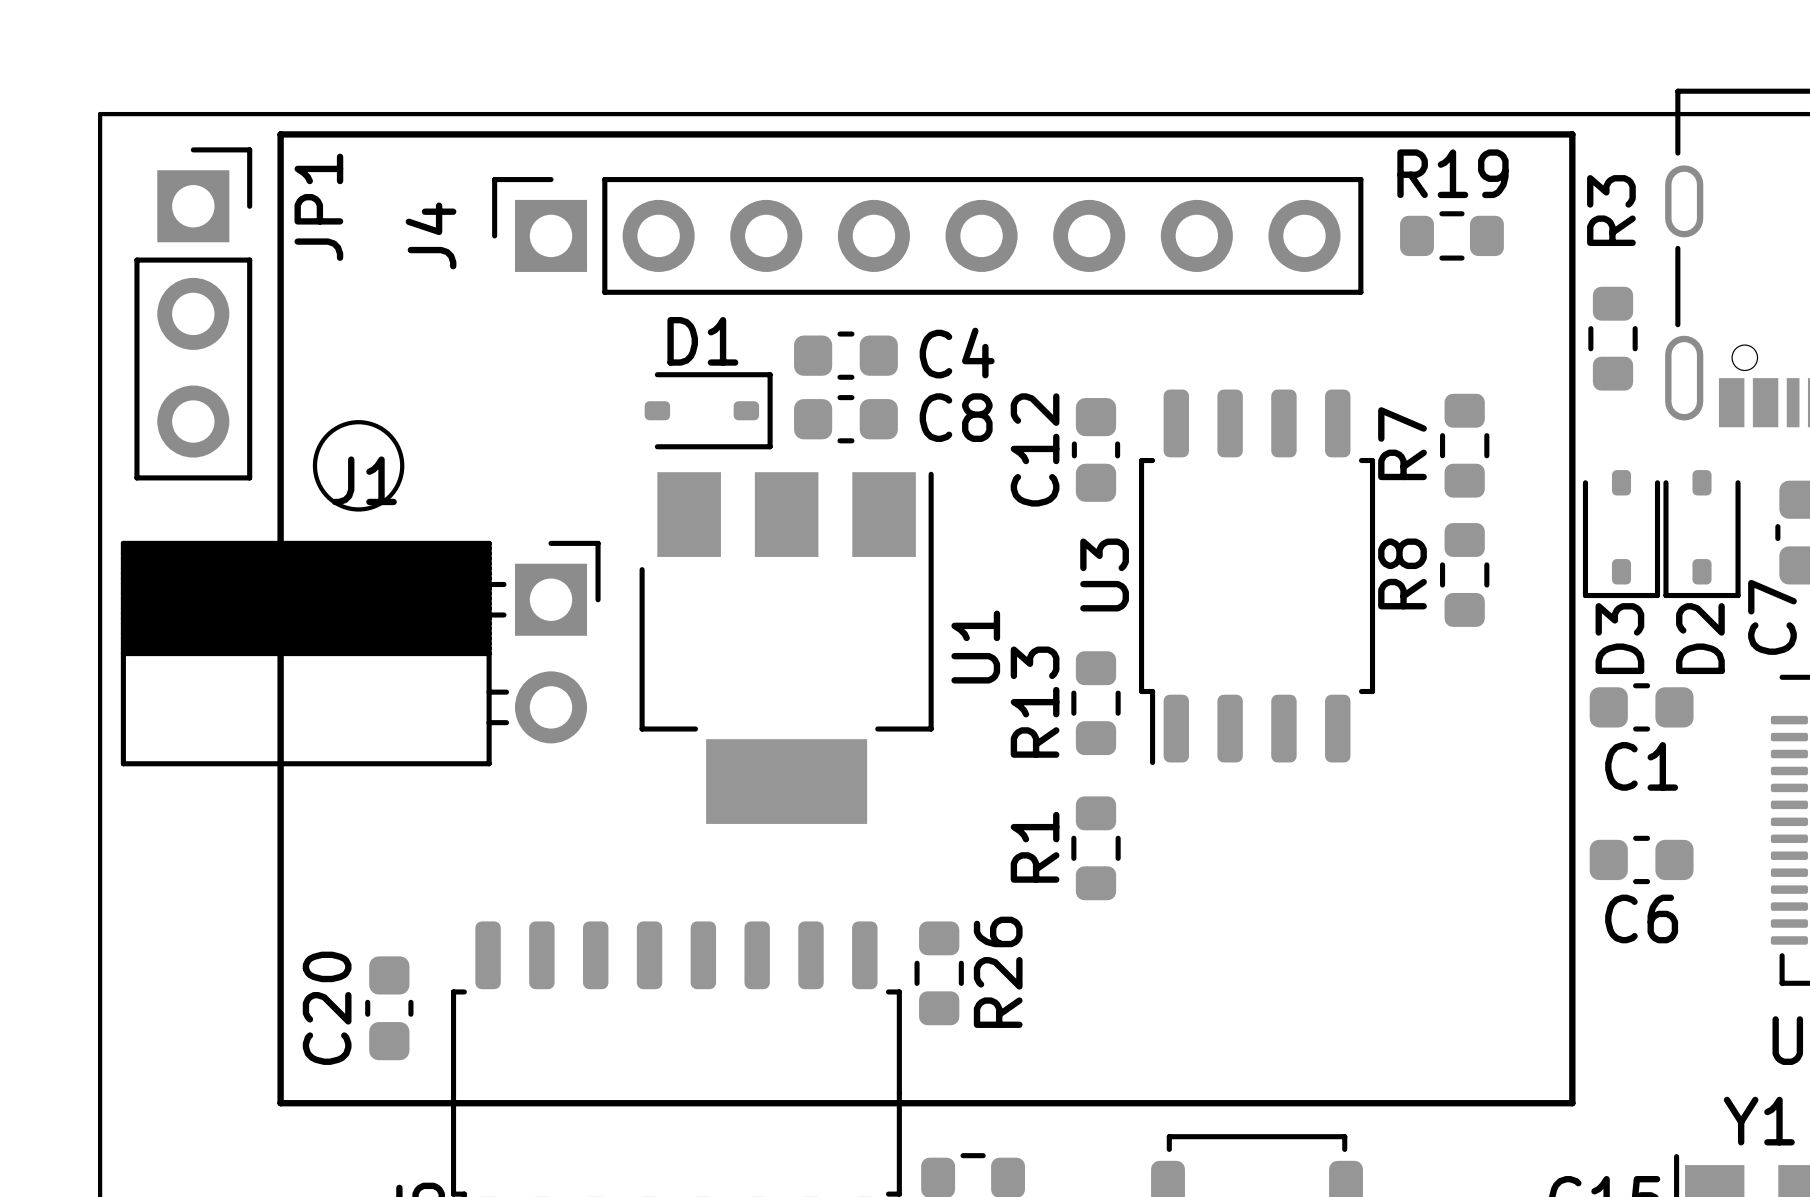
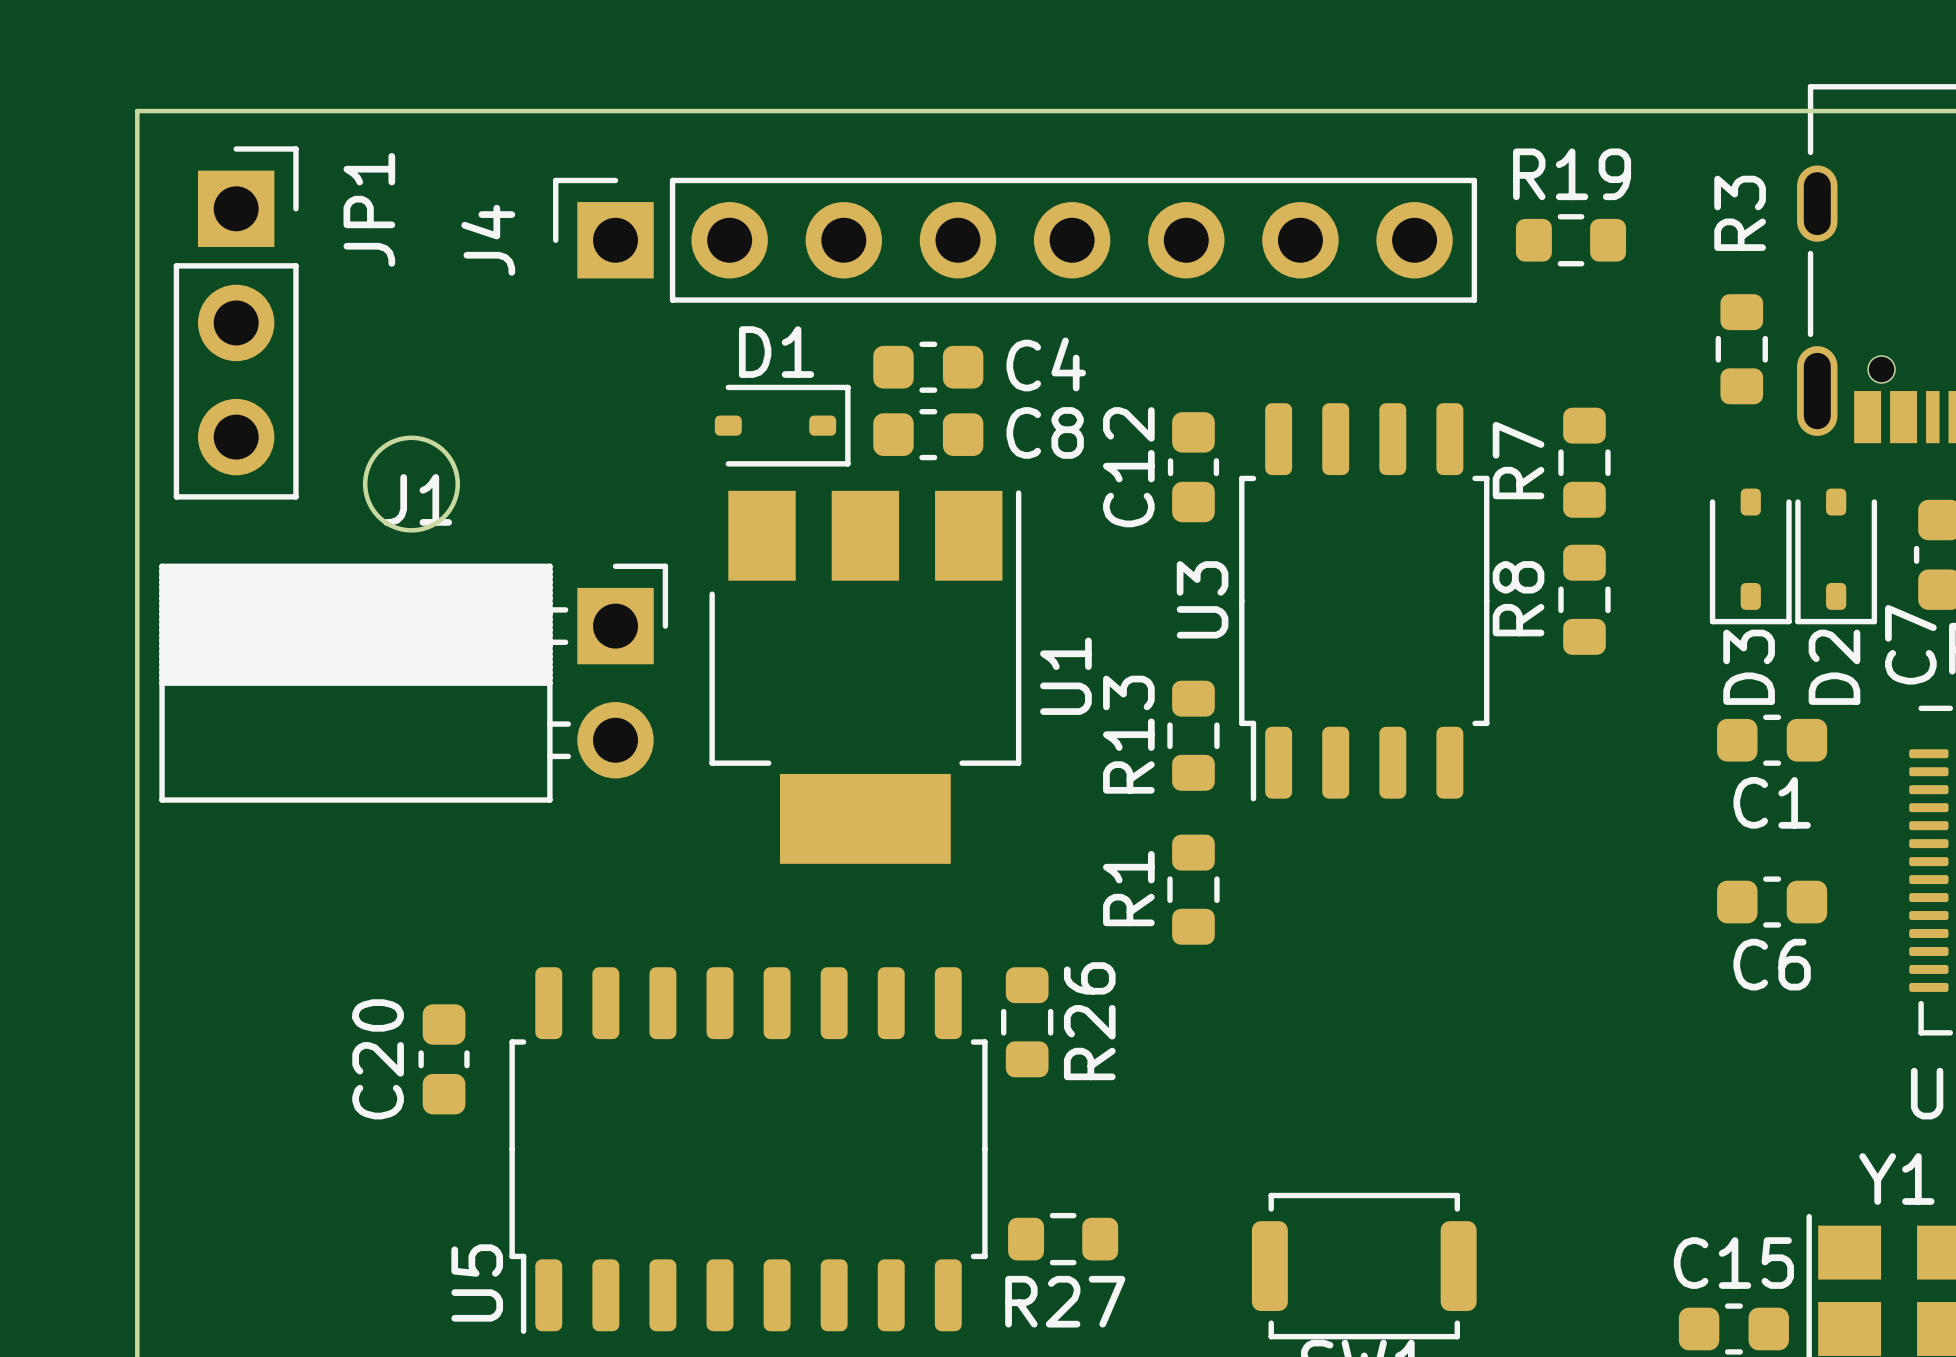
line: (280, 134) (280, 1103) (1572, 1103) (1572, 134) (280, 134) -> none

